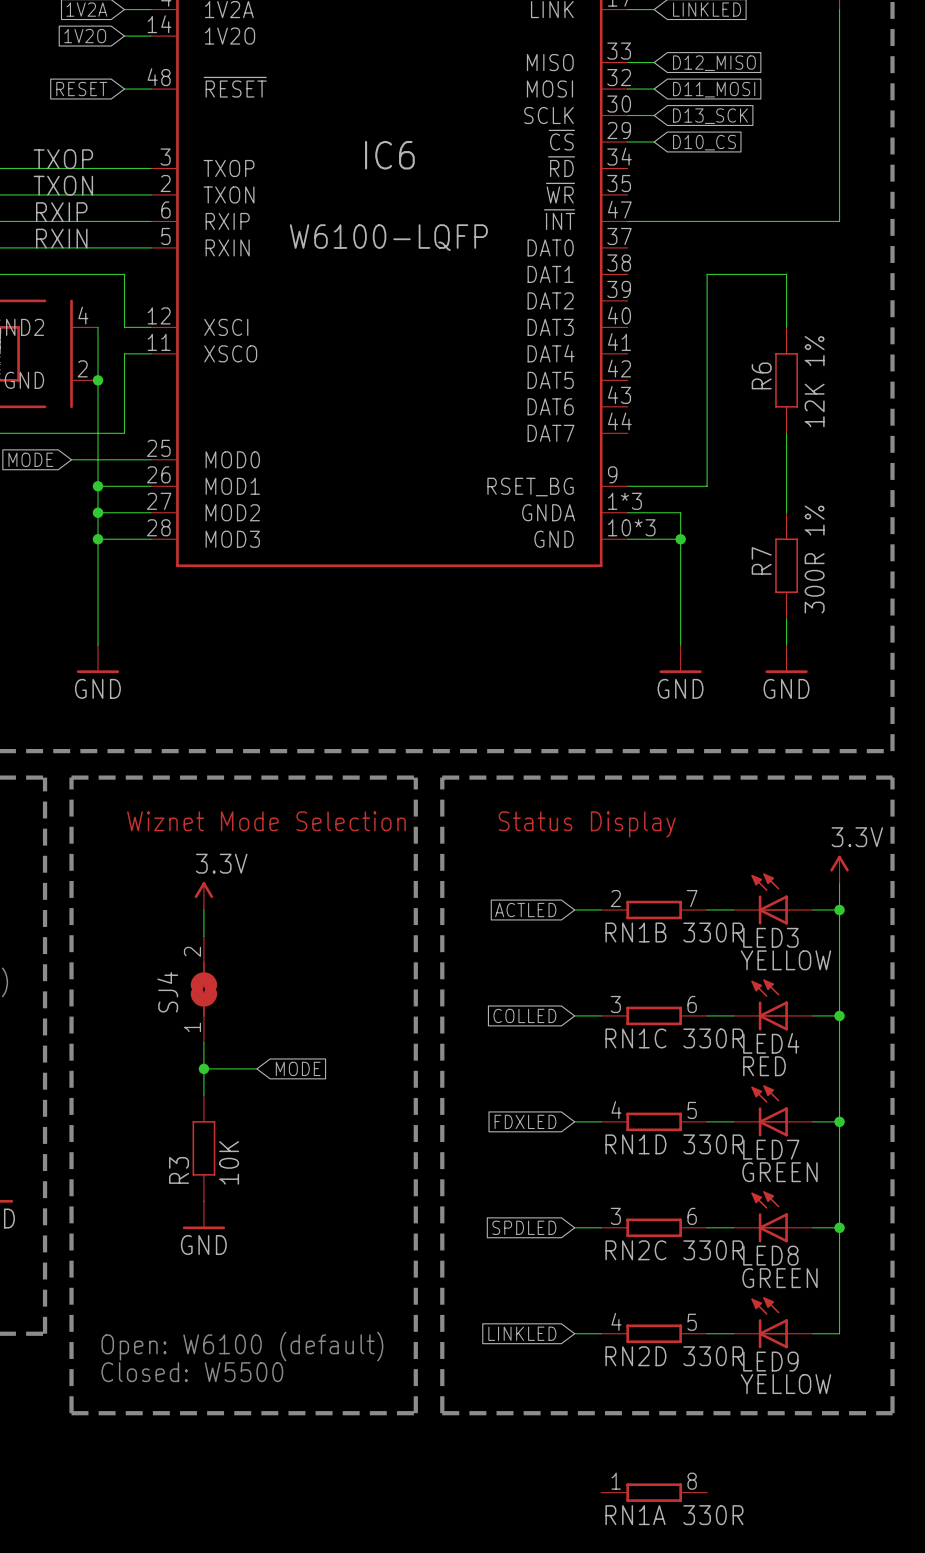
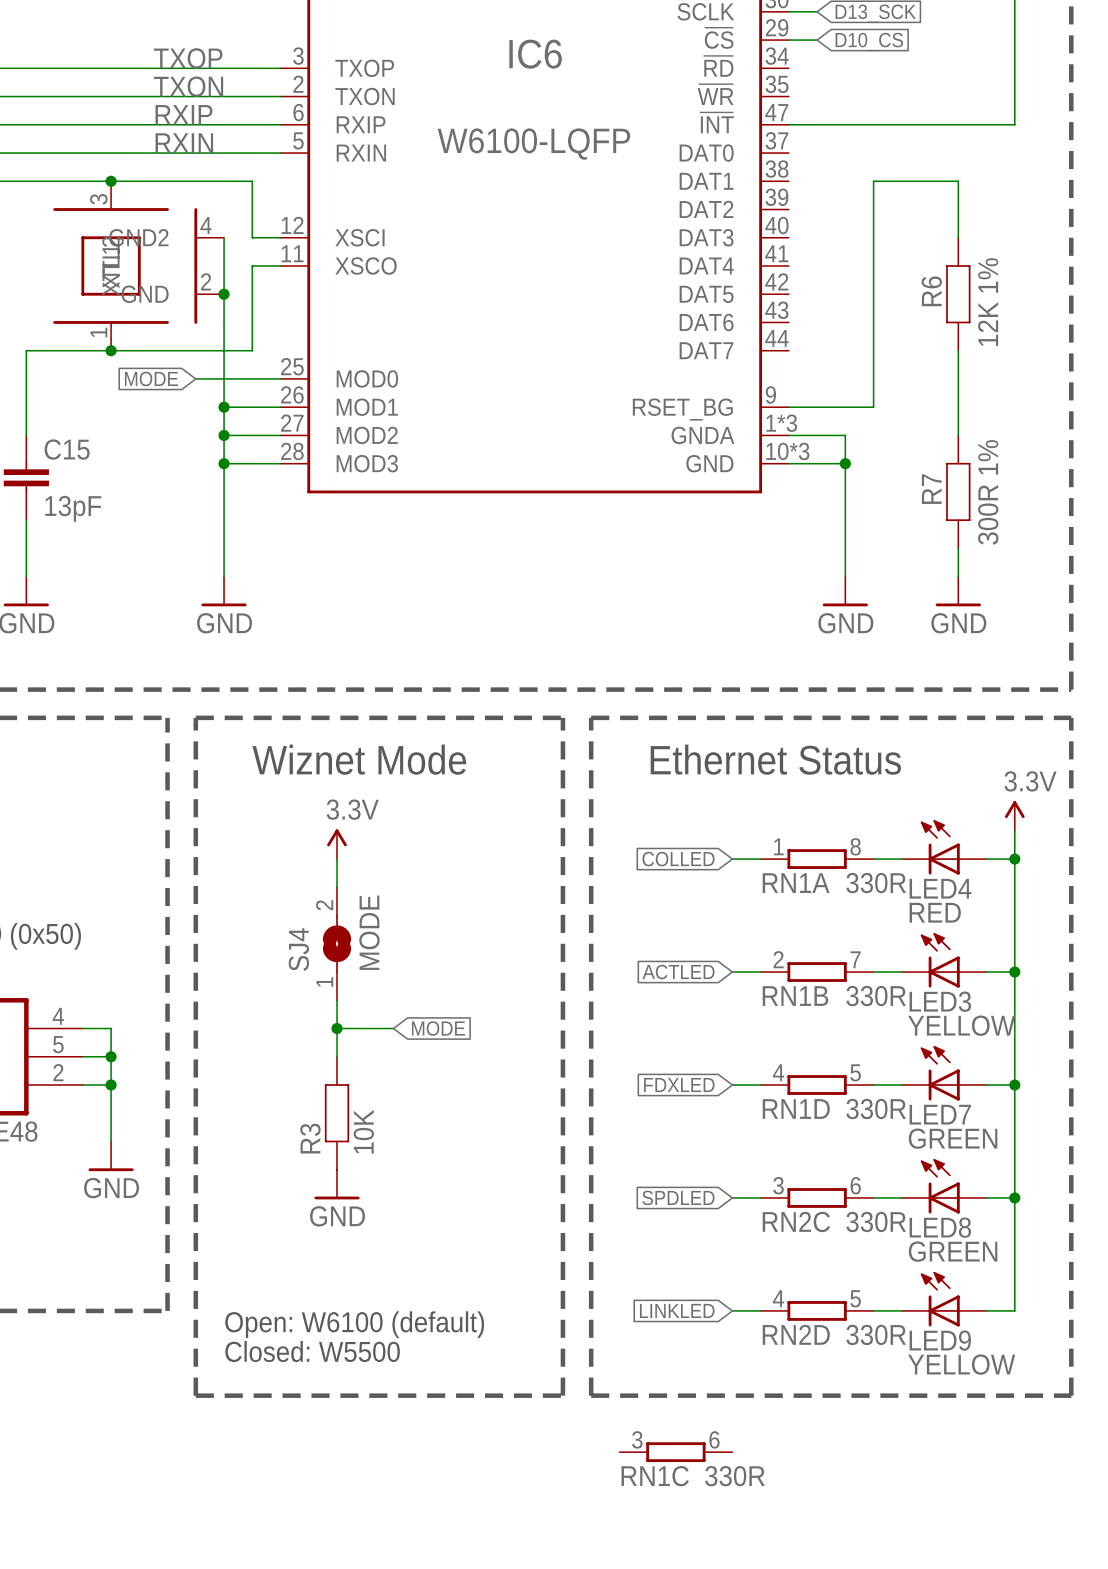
text: Wiznet Mode Selection (266, 821) -> Wiznet Mode (359, 759)
text: Status Display (587, 824) -> Ethernet Status (775, 759)
global label: ACTLED (525, 910) -> COLLED (678, 859)
RN1B position: (654, 910) -> (817, 972)
LED3 name: LED3 (770, 937) -> LED4 (940, 888)
LED3 value: YELLOW (785, 960) -> RED (935, 912)
SJ4 value: none -> MODE (369, 932)
global label: COLLED (524, 1015) -> ACTLED (678, 972)
RN1C position: (654, 1015) -> (675, 1452)
LED4 name: LED4 (771, 1043) -> LED3 (940, 1001)
LED4 value: RED (764, 1066) -> YELLOW (961, 1025)
RN1A position: (654, 1492) -> (817, 859)

